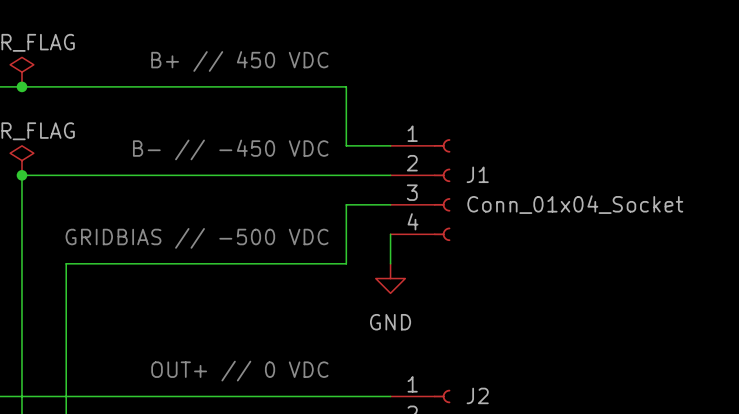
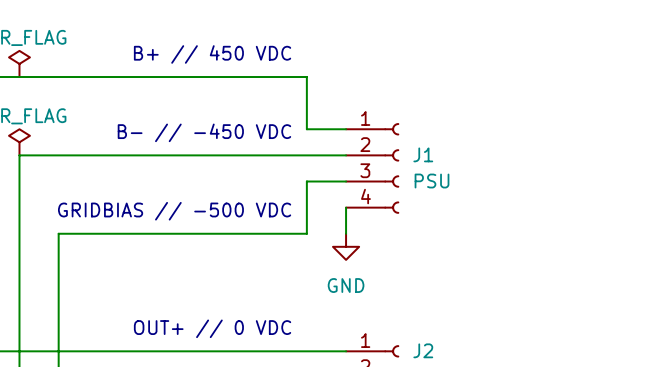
junction: (21, 86) -> none
junction: (21, 175) -> none
J1 value: Conn_01x04_Socket (575, 204) -> PSU (432, 181)

